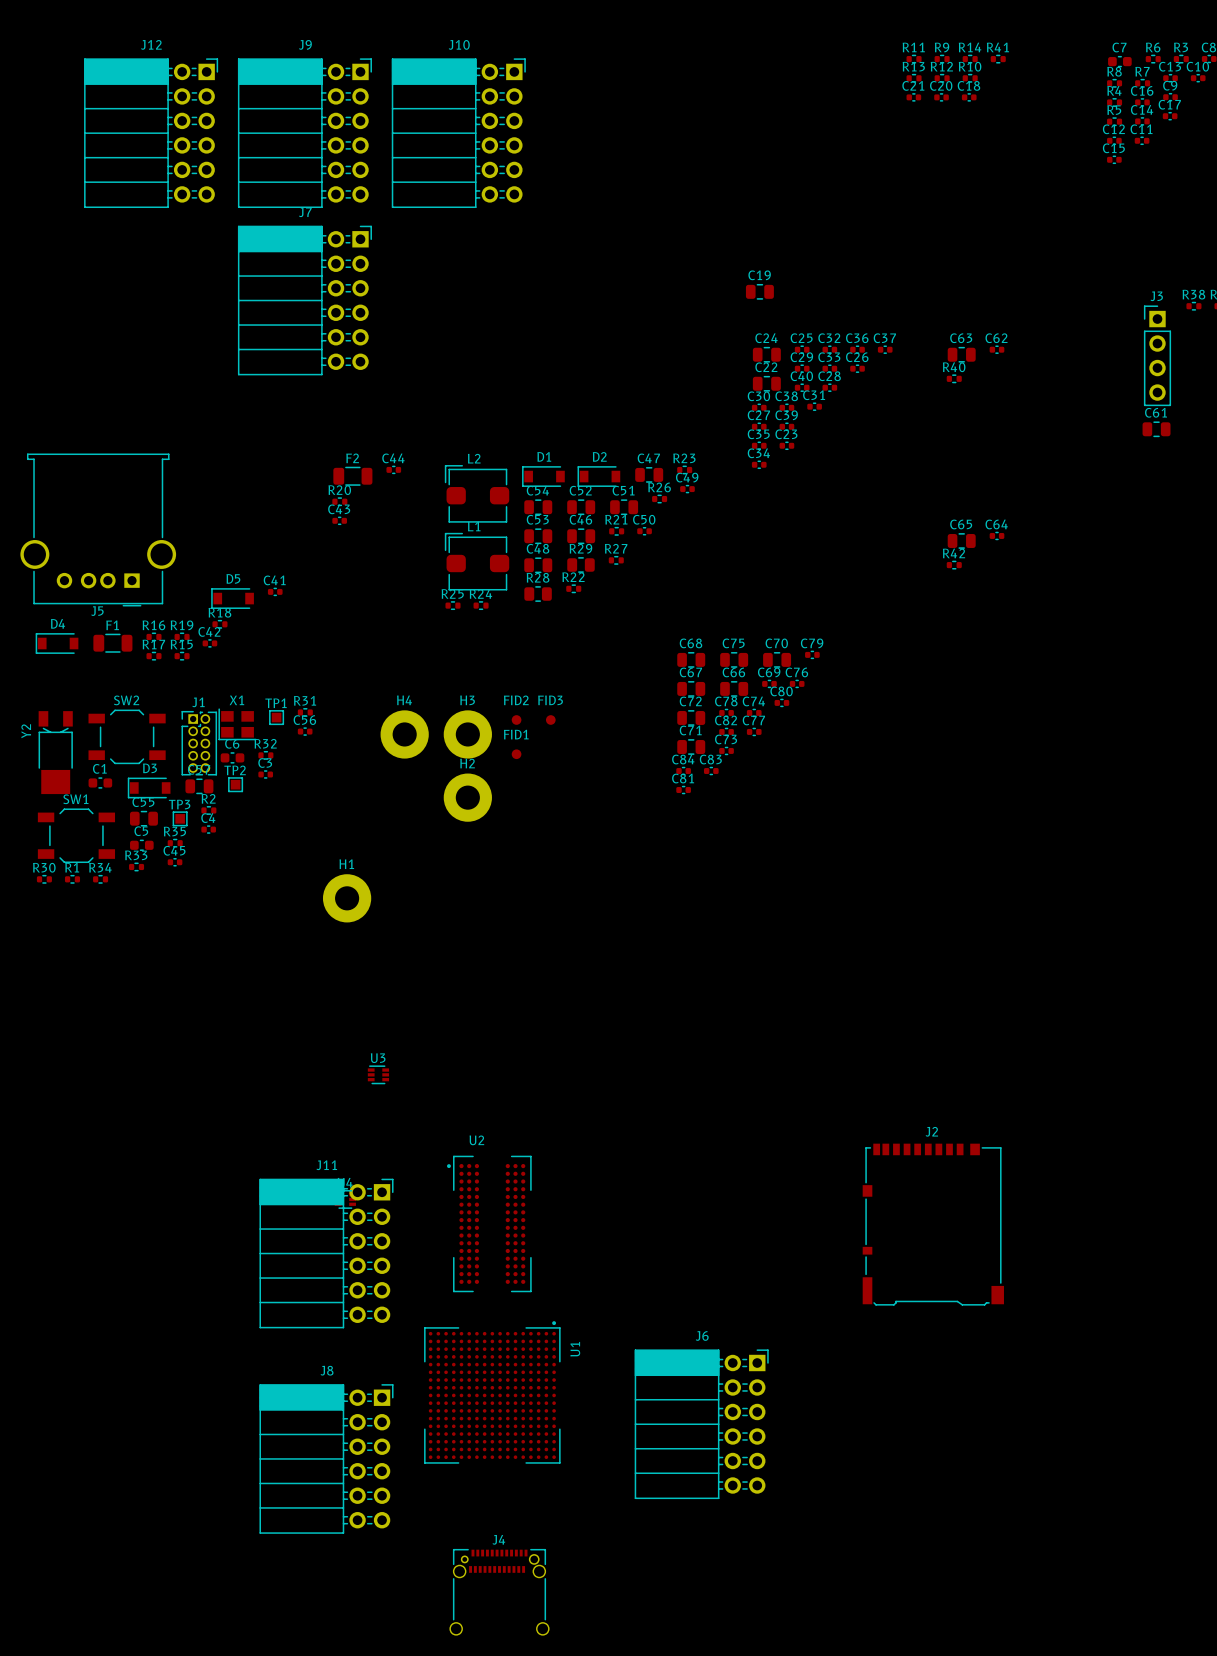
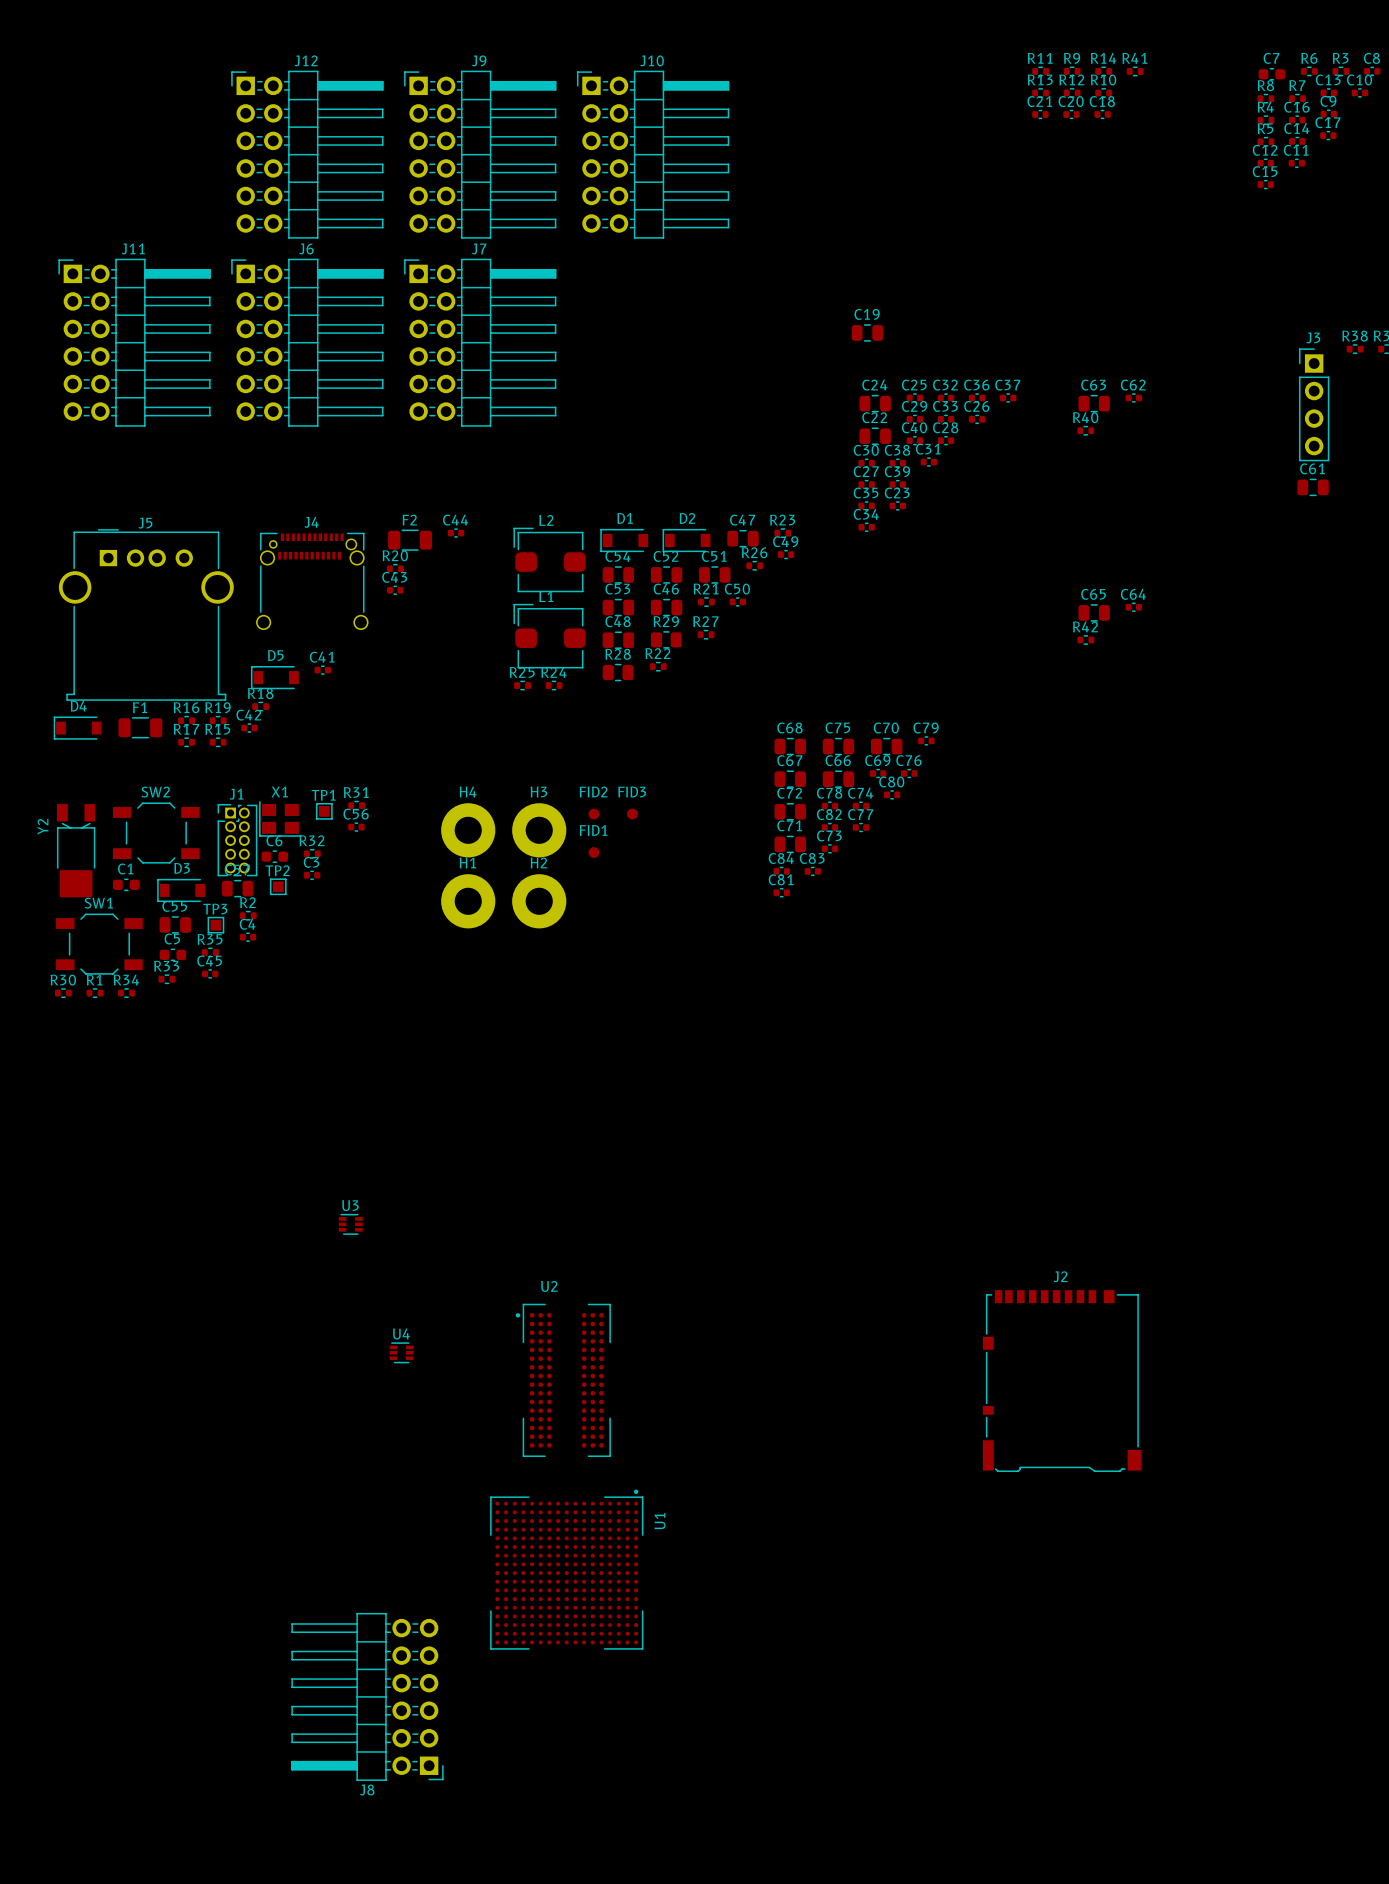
J12 footprint: [84, 58, 218, 208] -> [231, 70, 384, 239]
J9 footprint: [238, 58, 372, 208] -> [404, 70, 557, 239]
J10 footprint: [391, 58, 526, 208] -> [577, 70, 730, 239]
J7 footprint: [238, 225, 372, 376] -> [404, 258, 557, 427]
J5 rotation: 0° (98, 529) -> 180° (146, 614)
H1 position: (347, 898) -> (468, 901)
U3 position: (378, 1074) -> (350, 1224)
J11 footprint: [259, 1178, 394, 1329] -> [58, 258, 211, 427]
J6 footprint: [634, 1349, 769, 1499] -> [231, 258, 384, 427]
J8 name position: J8 (327, 1370) -> J8 (367, 1790)
J8 footprint: [259, 1384, 394, 1534] -> [291, 1613, 444, 1781]
J4 position: (499, 1592) -> (312, 581)

